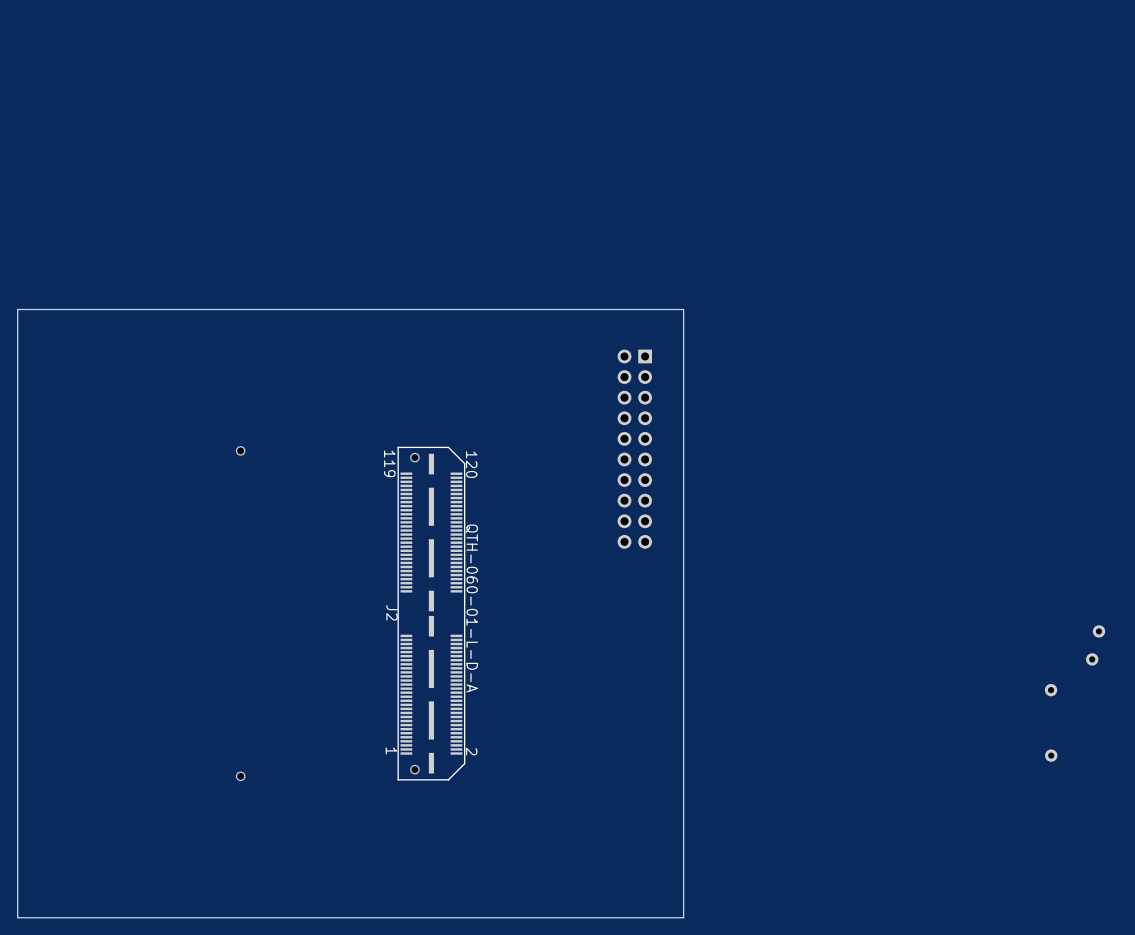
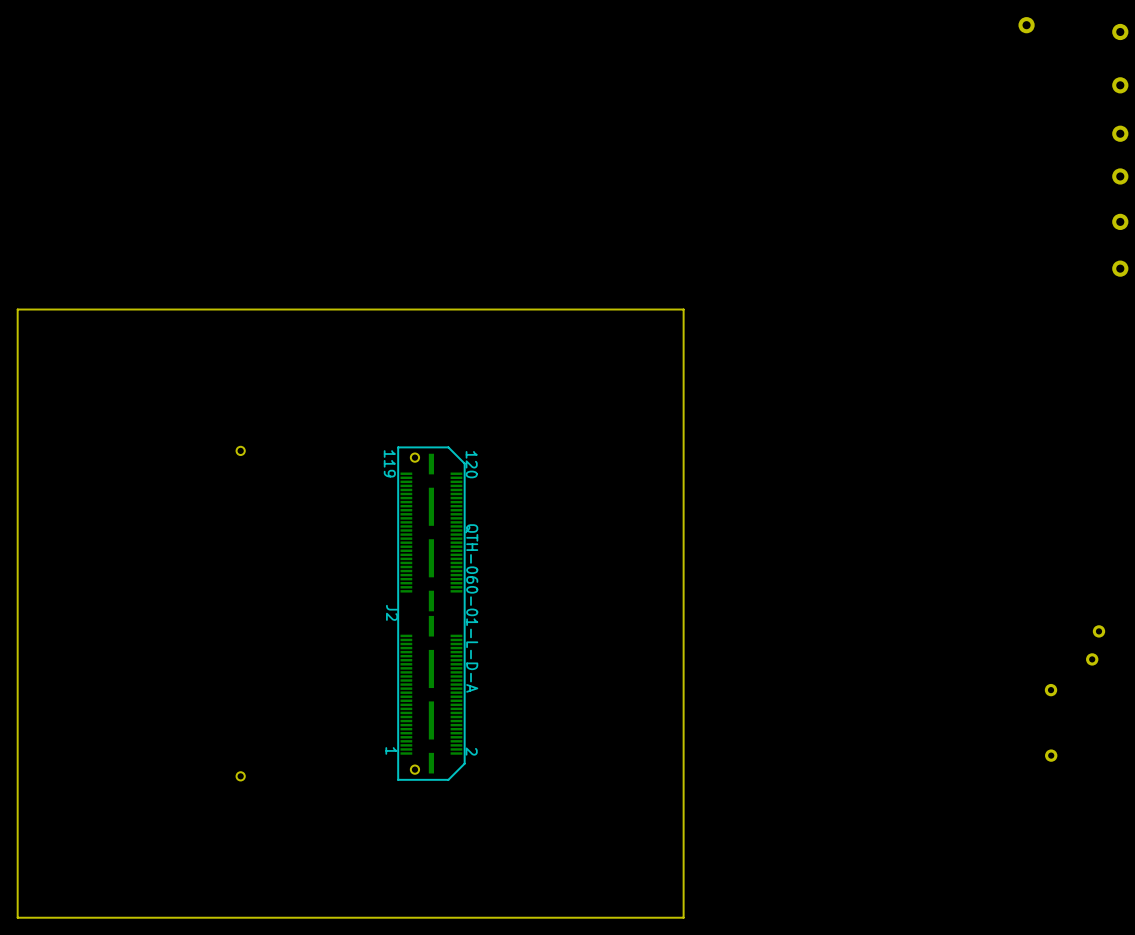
part: none -> (1026, 25)
part: none -> (1120, 31)
part: none -> (1120, 85)
part: none -> (1120, 133)
part: none -> (1120, 176)
part: none -> (1120, 221)
part: none -> (1120, 268)
part: (634, 449) -> none

